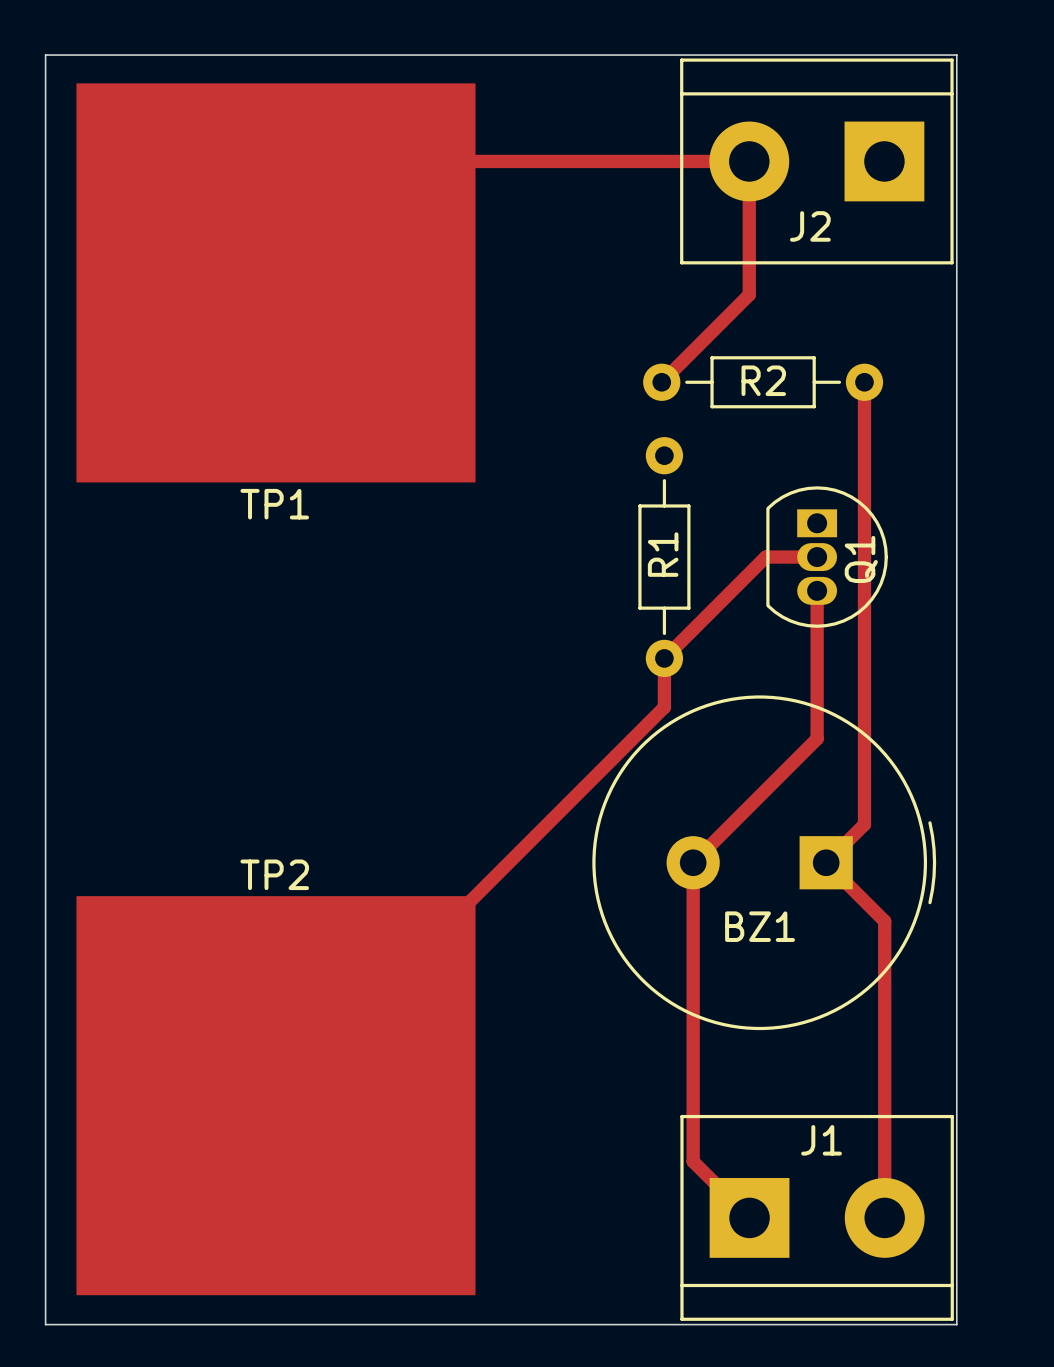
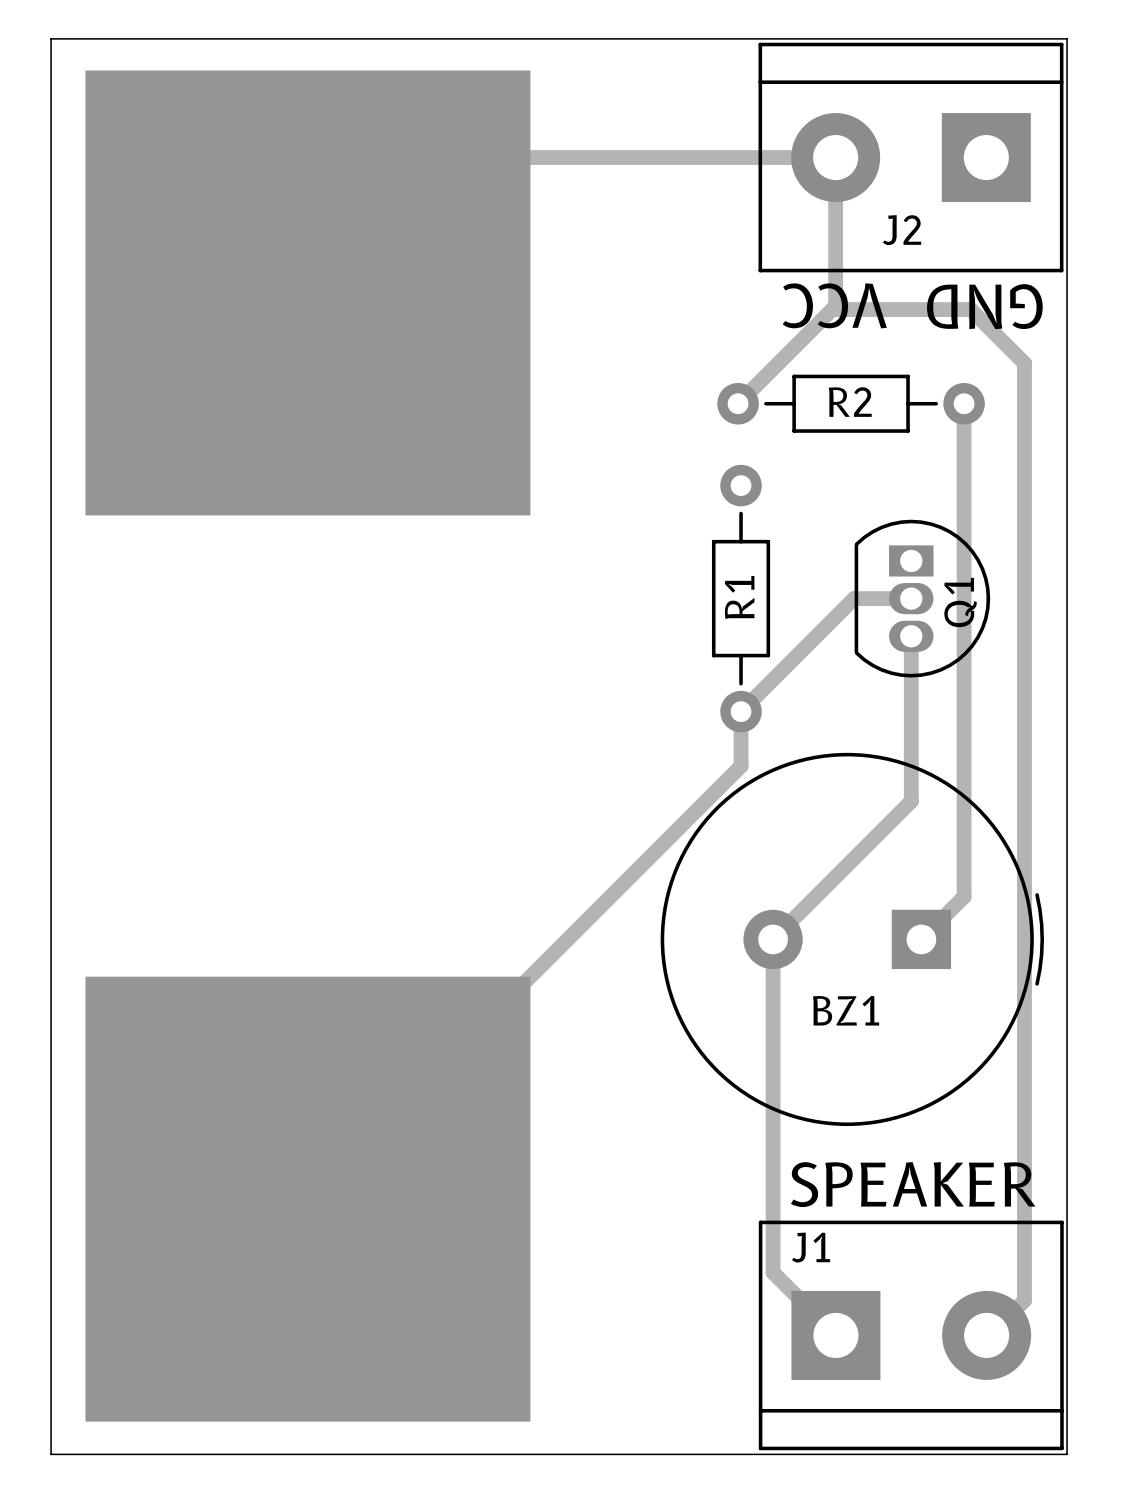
text: none -> VCC (834, 305)
text: none -> GND (984, 306)
TP1 name: TP1 (274, 504) -> none
track: (826, 862) (884, 921) (884, 1217) -> (832, 309) (970, 309) (1024, 363) (1024, 1300) (989, 1335) (986, 1335)
TP2 name: TP2 (274, 874) -> none
text: none -> SPEAKER (913, 1184)
J1 name position: J1 (821, 1140) -> J1 (811, 1247)

